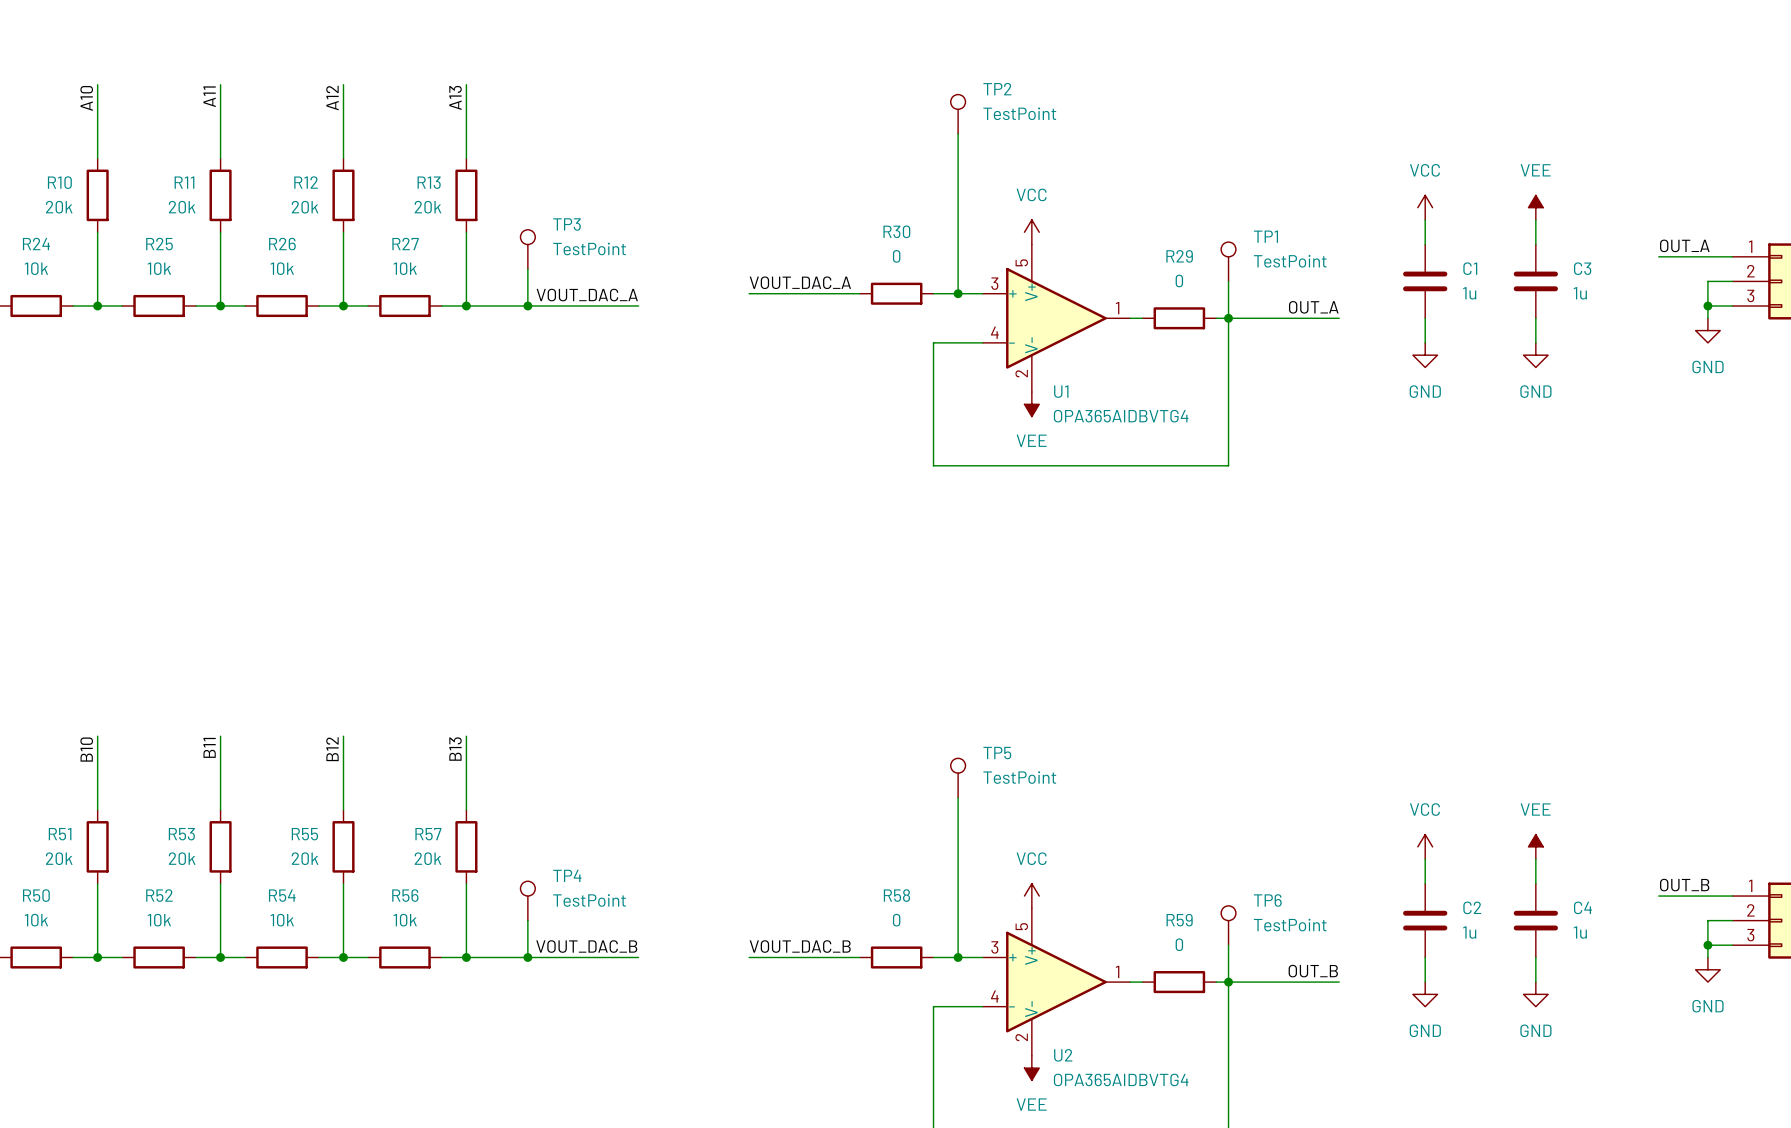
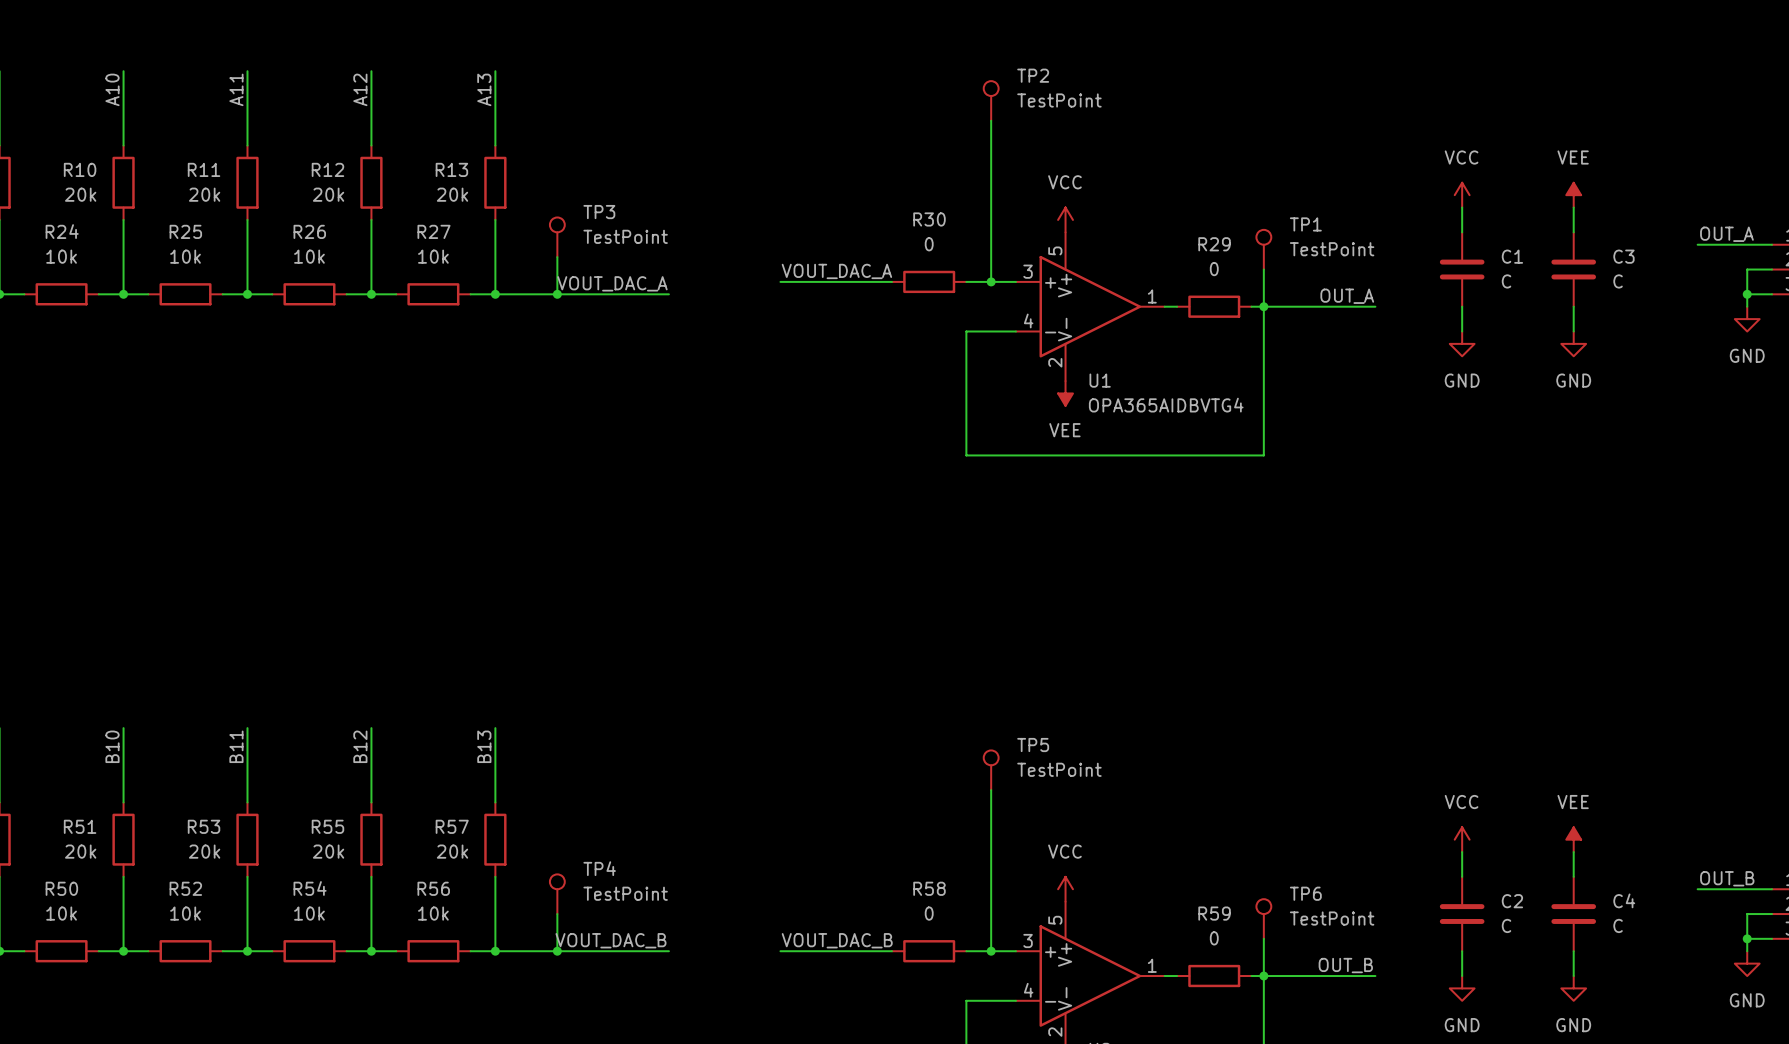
C1 value: 1u (1469, 293) -> C (1506, 281)
C3 value: 1u (1580, 293) -> C (1618, 281)
C2 value: 1u (1469, 932) -> C (1506, 925)
C4 value: 1u (1580, 932) -> C (1618, 925)

